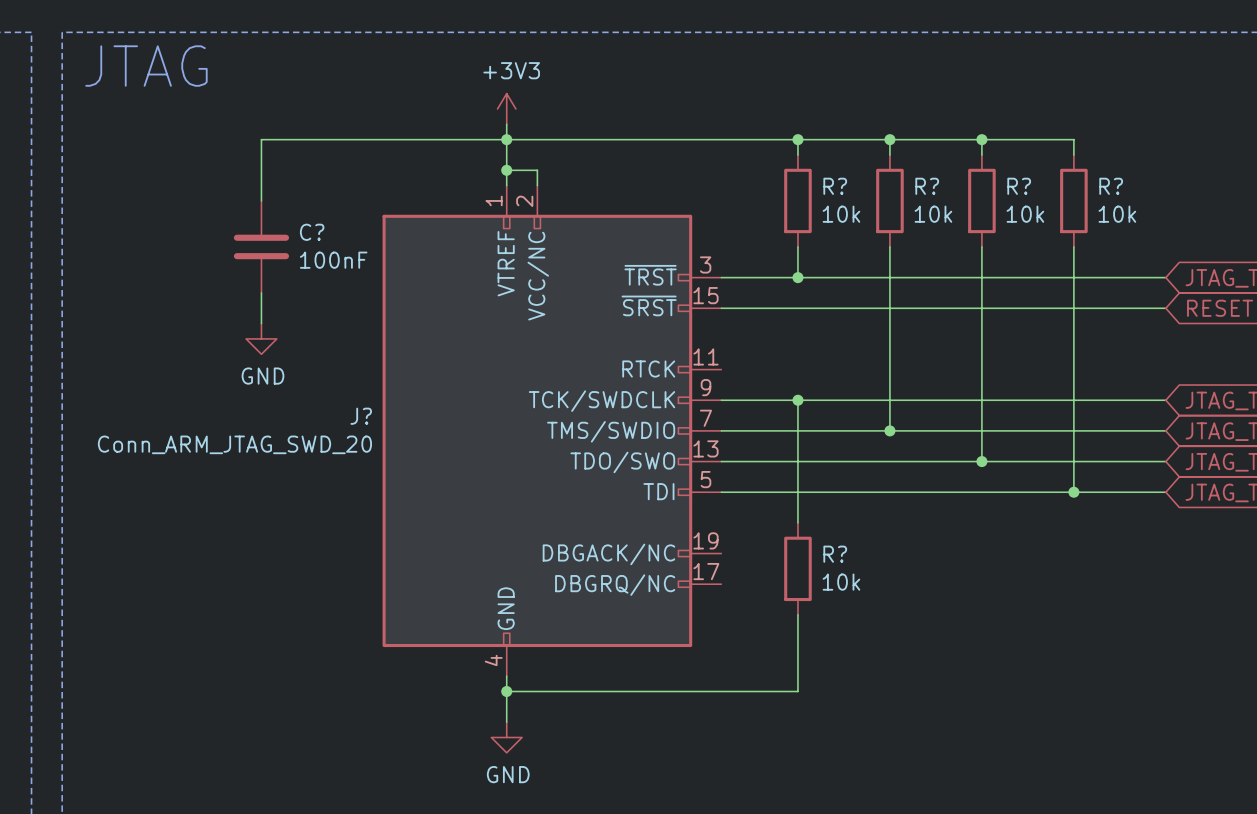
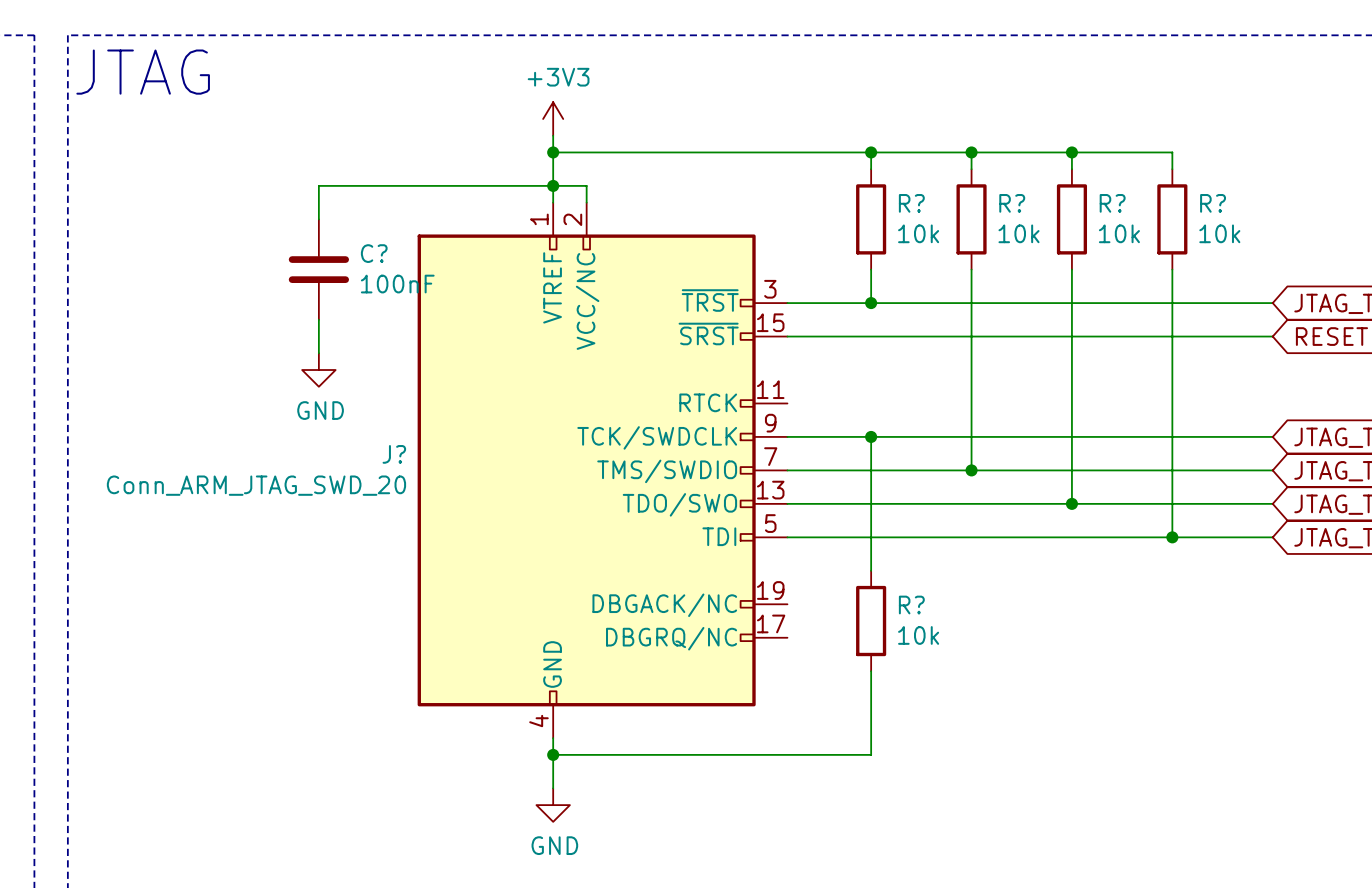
text position: JTAG (146, 66) -> JTAG (143, 72)
wire: (506, 139) (261, 139) (261, 200) -> none
wire: none -> (553, 185) (318, 185) (318, 219)
C? position: (261, 246) -> (318, 269)
wire: (261, 292) (261, 323) -> (318, 319) (318, 353)
power symbol position: GND (261, 338) -> GND (318, 370)

